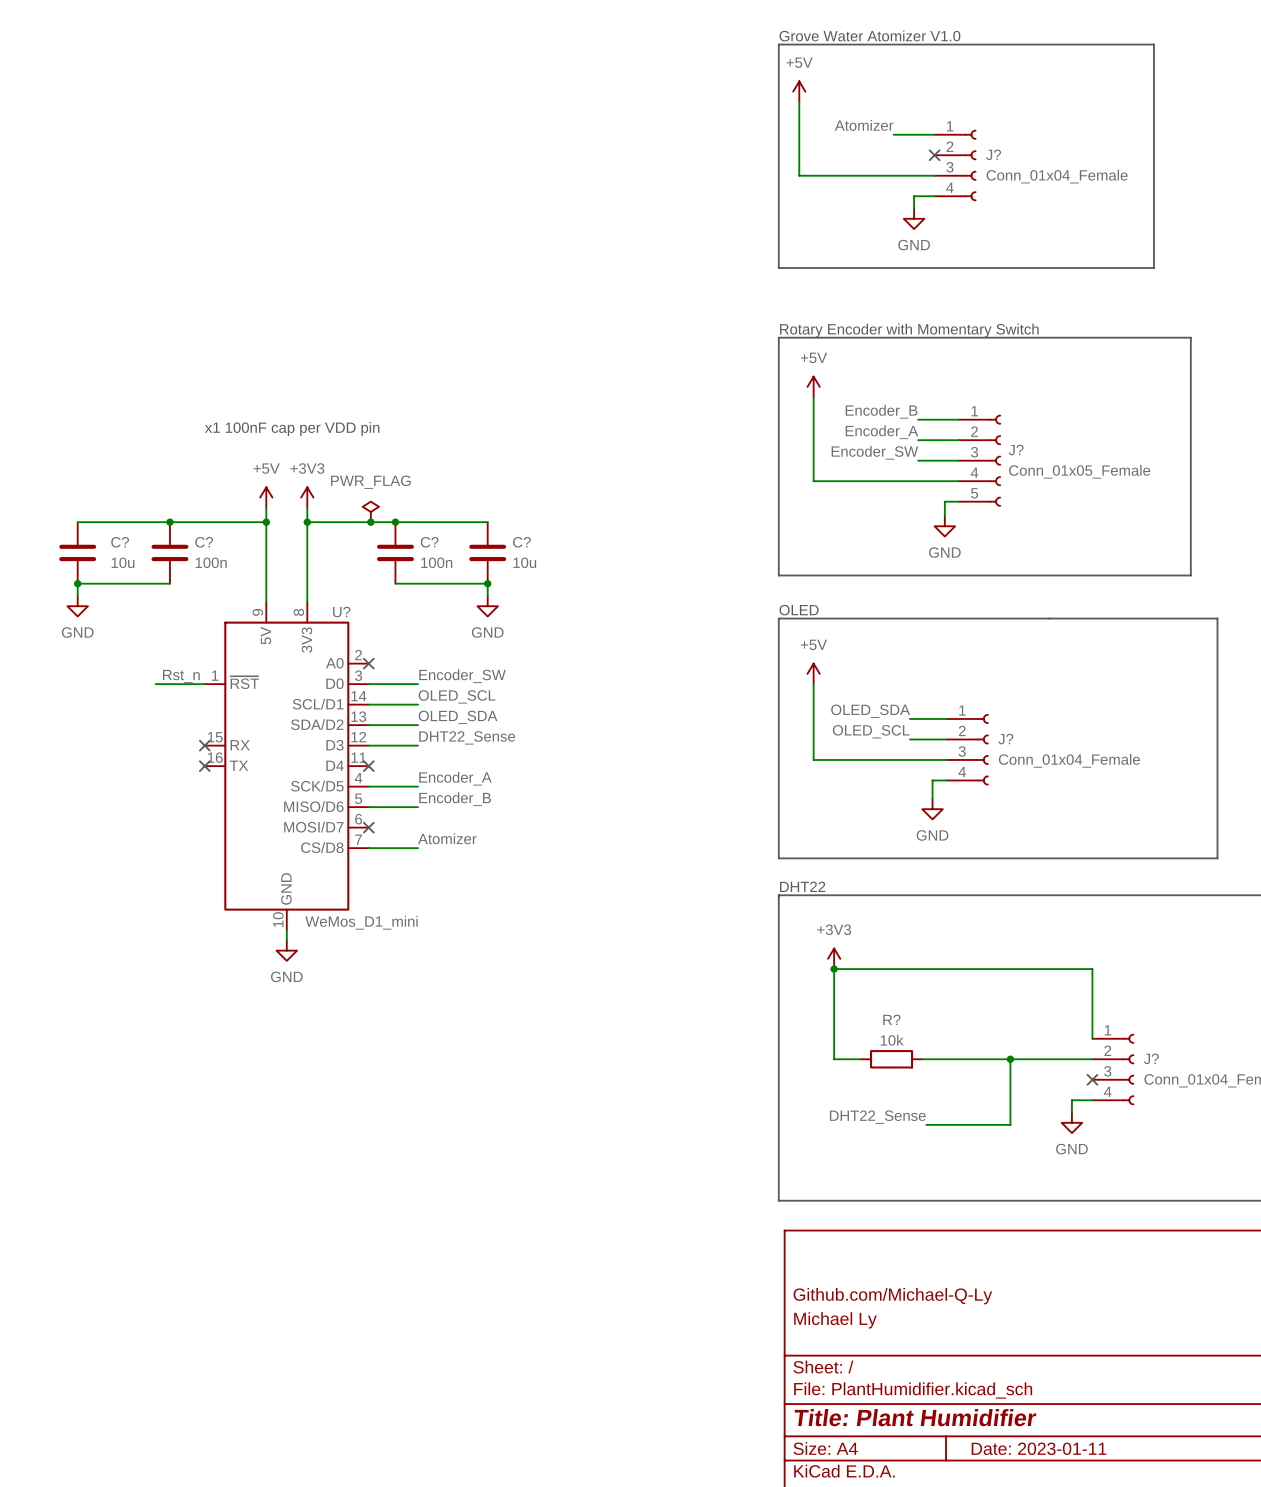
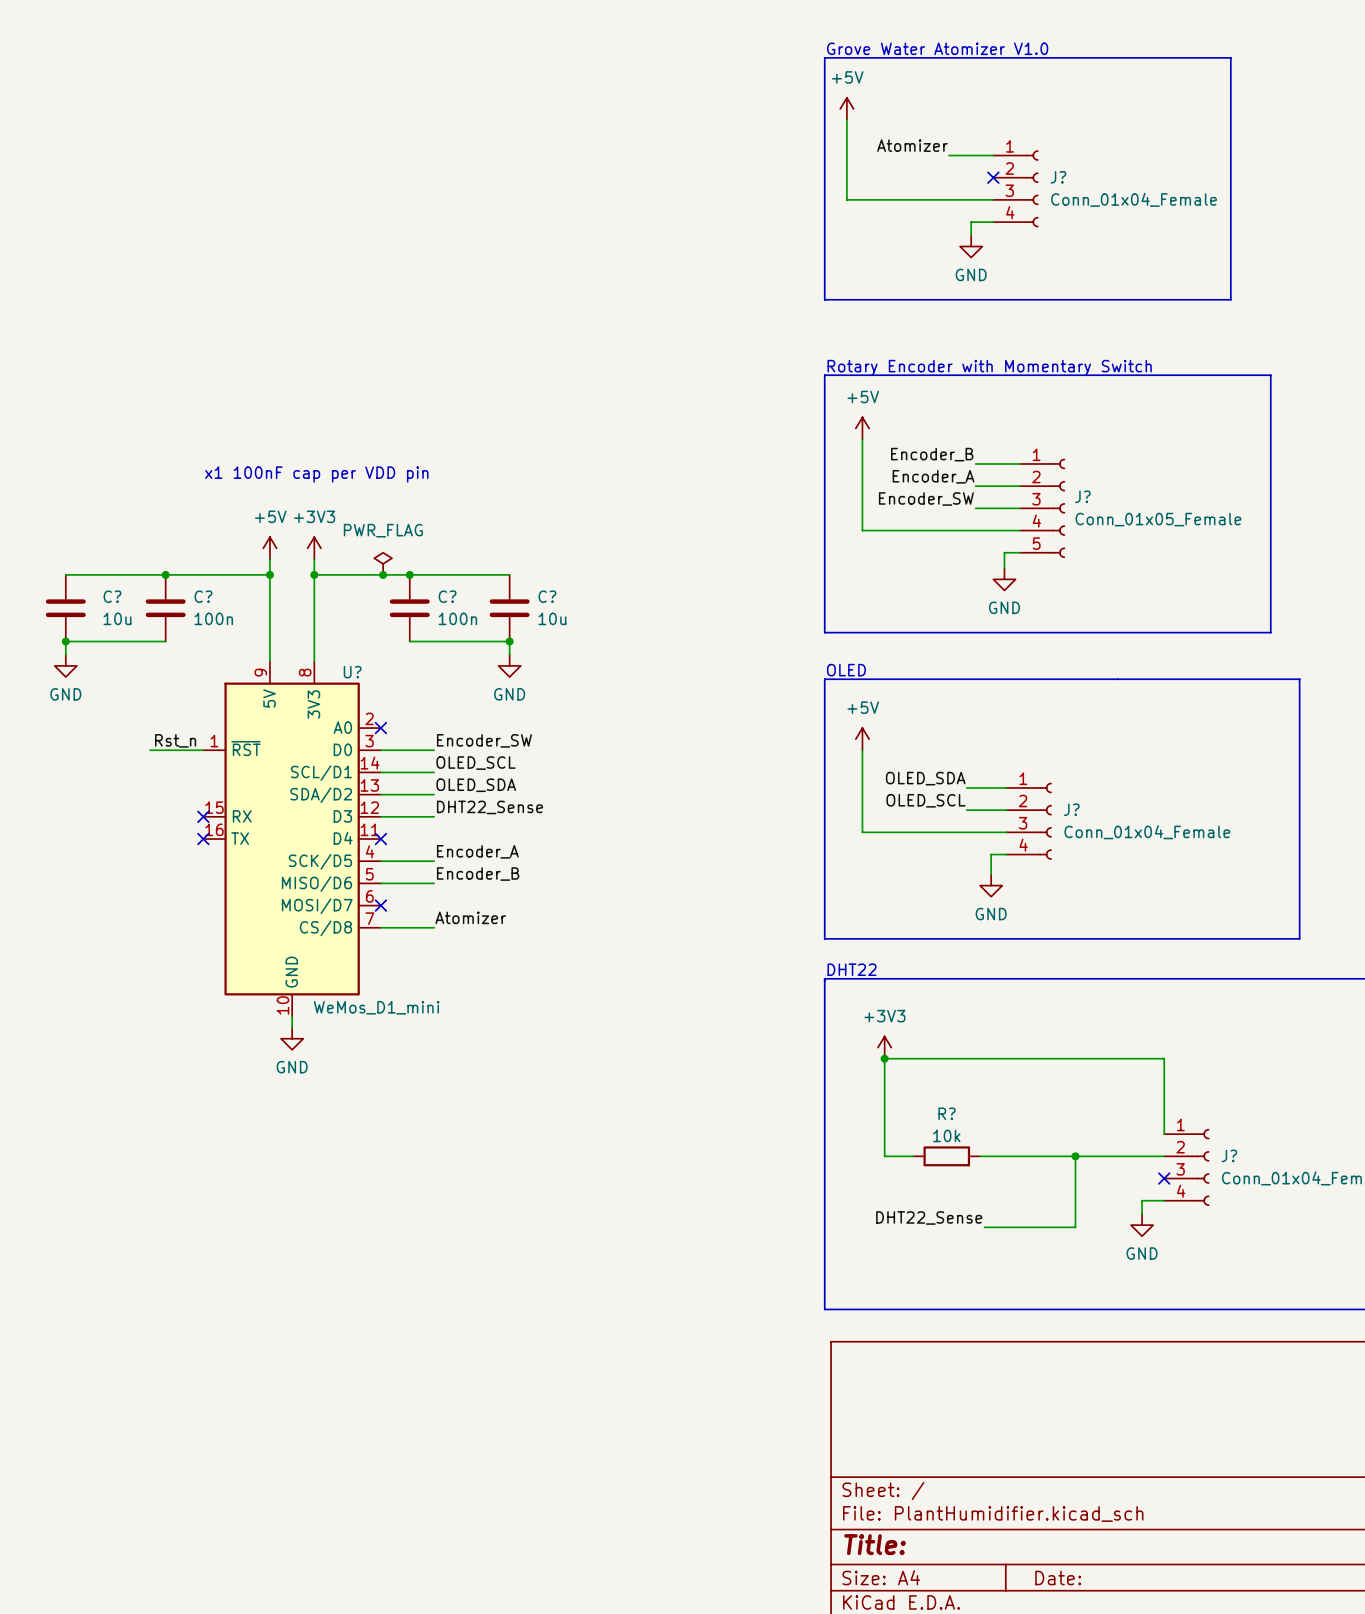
title block: Github.com/Michael-Q-Ly (892, 1296) -> none
title block: Michael Ly (835, 1320) -> none
title block: Title: Plant Humidifier (915, 1417) -> Title: (875, 1544)
title block: Date: 2023-01-11 (1039, 1448) -> Date: (1058, 1578)

